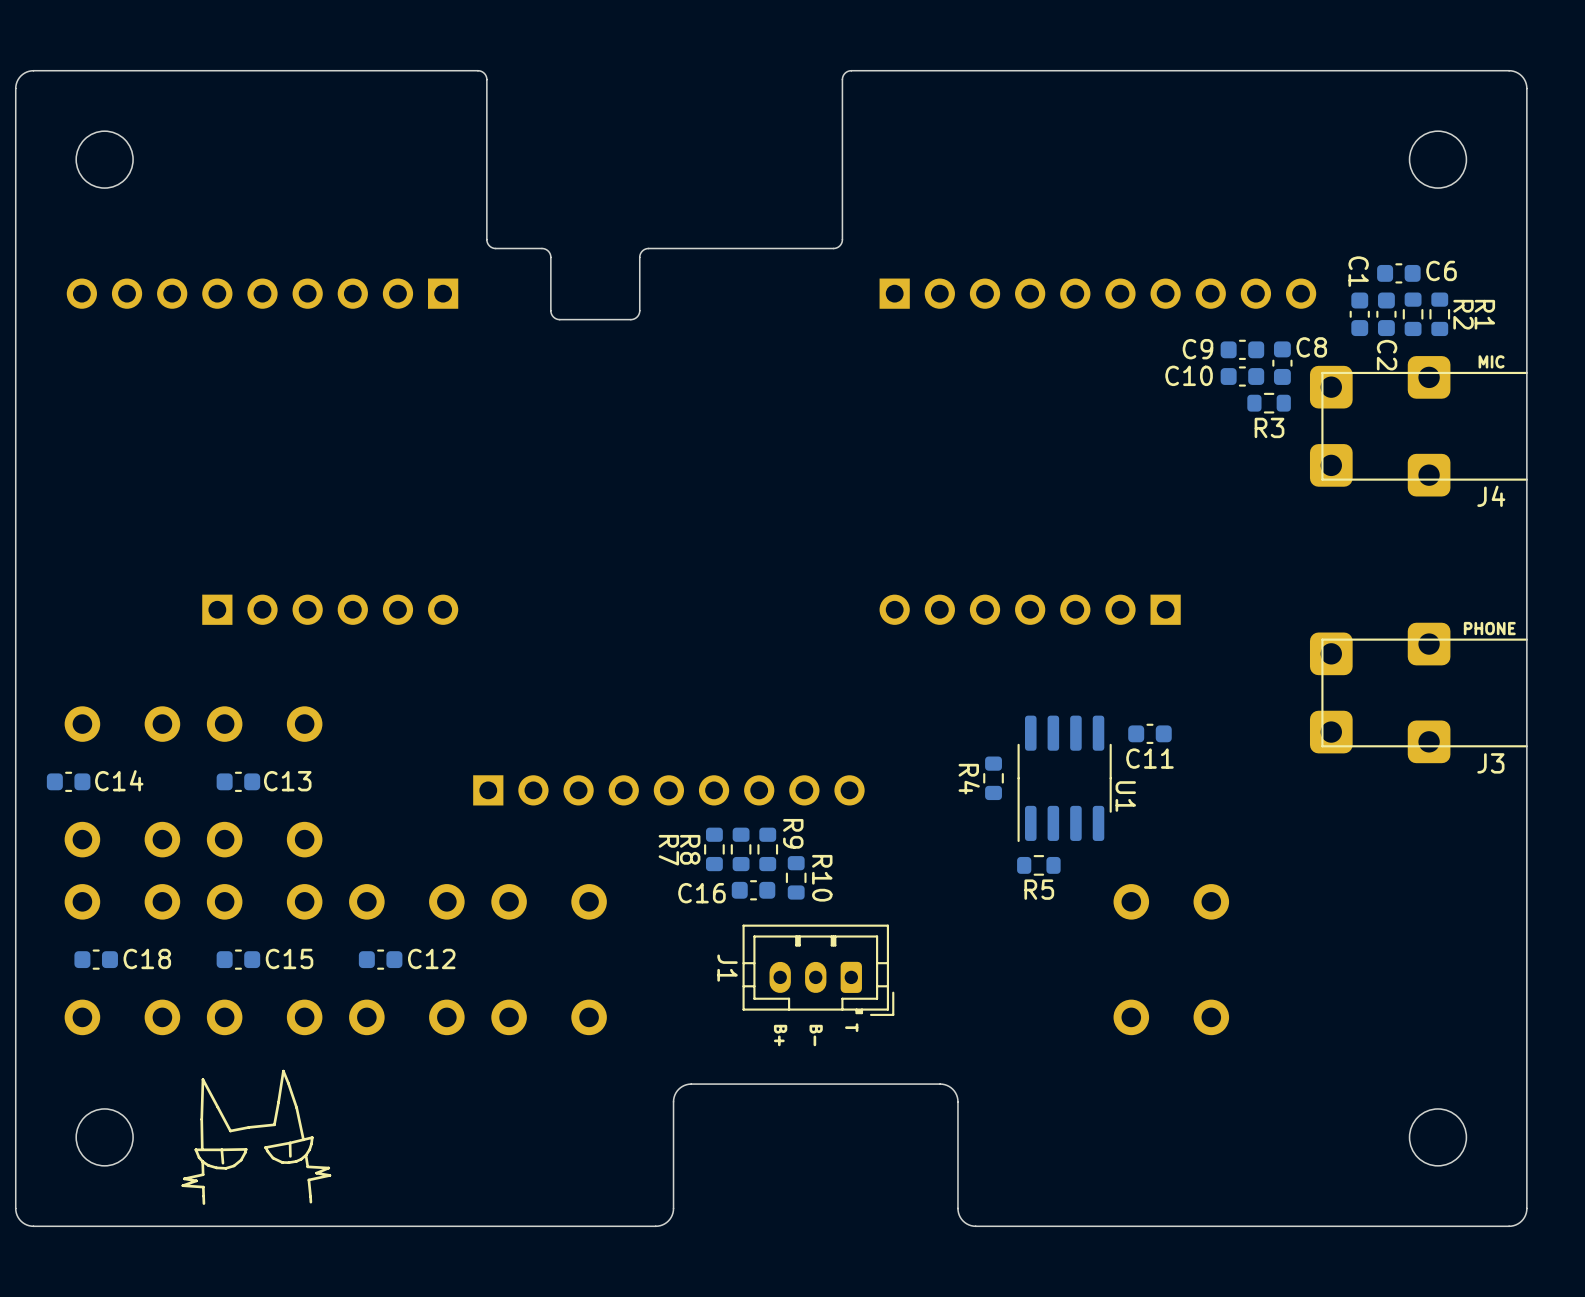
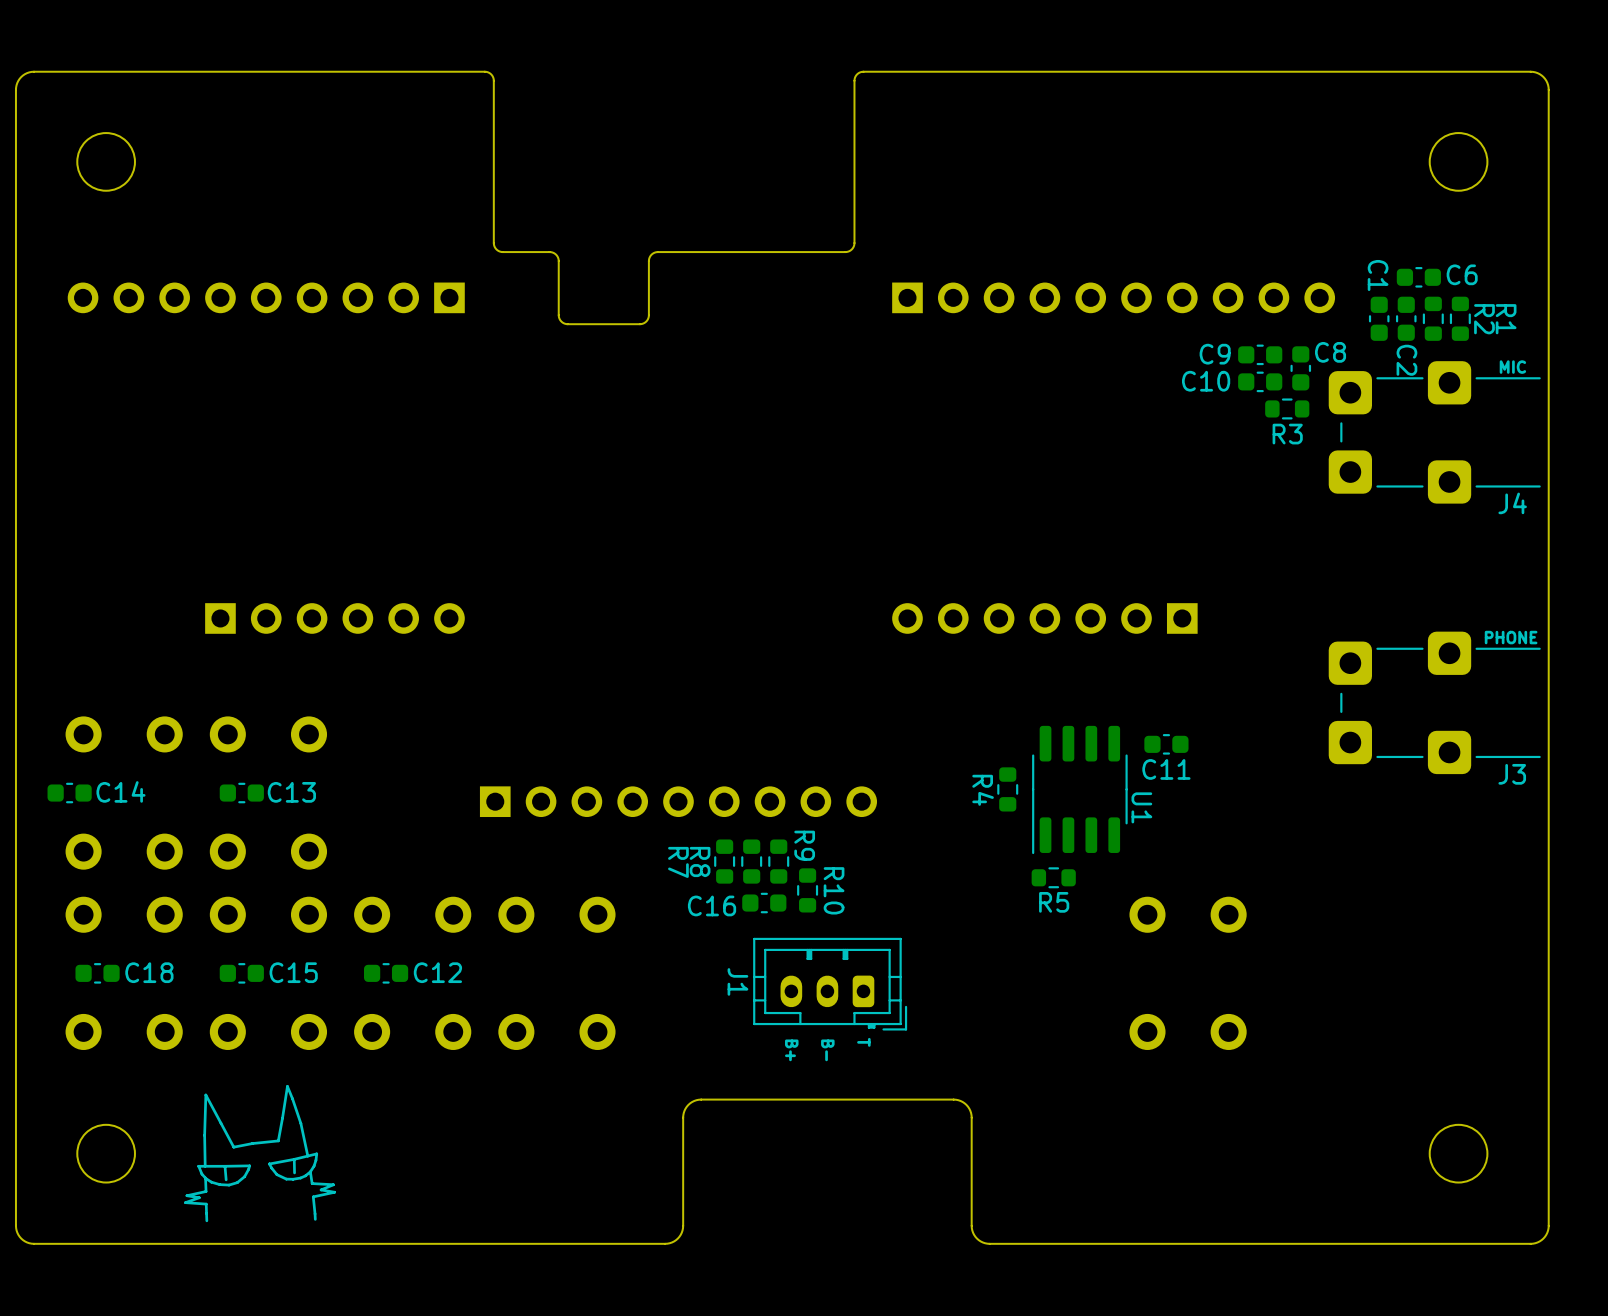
J4 footprint: [1309, 356, 1528, 497] -> [1328, 361, 1541, 504]
J3 footprint: [1309, 622, 1528, 764] -> [1328, 631, 1541, 775]

